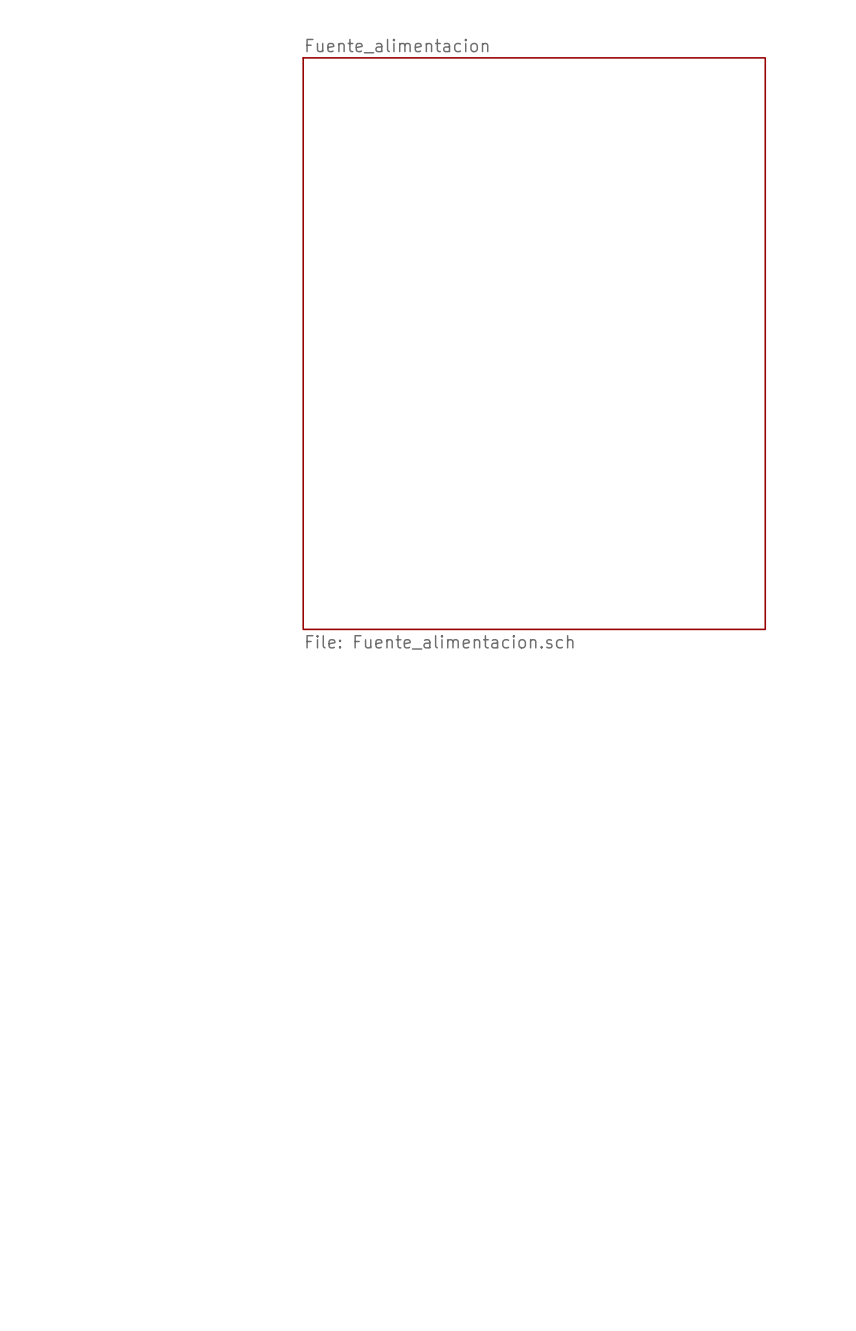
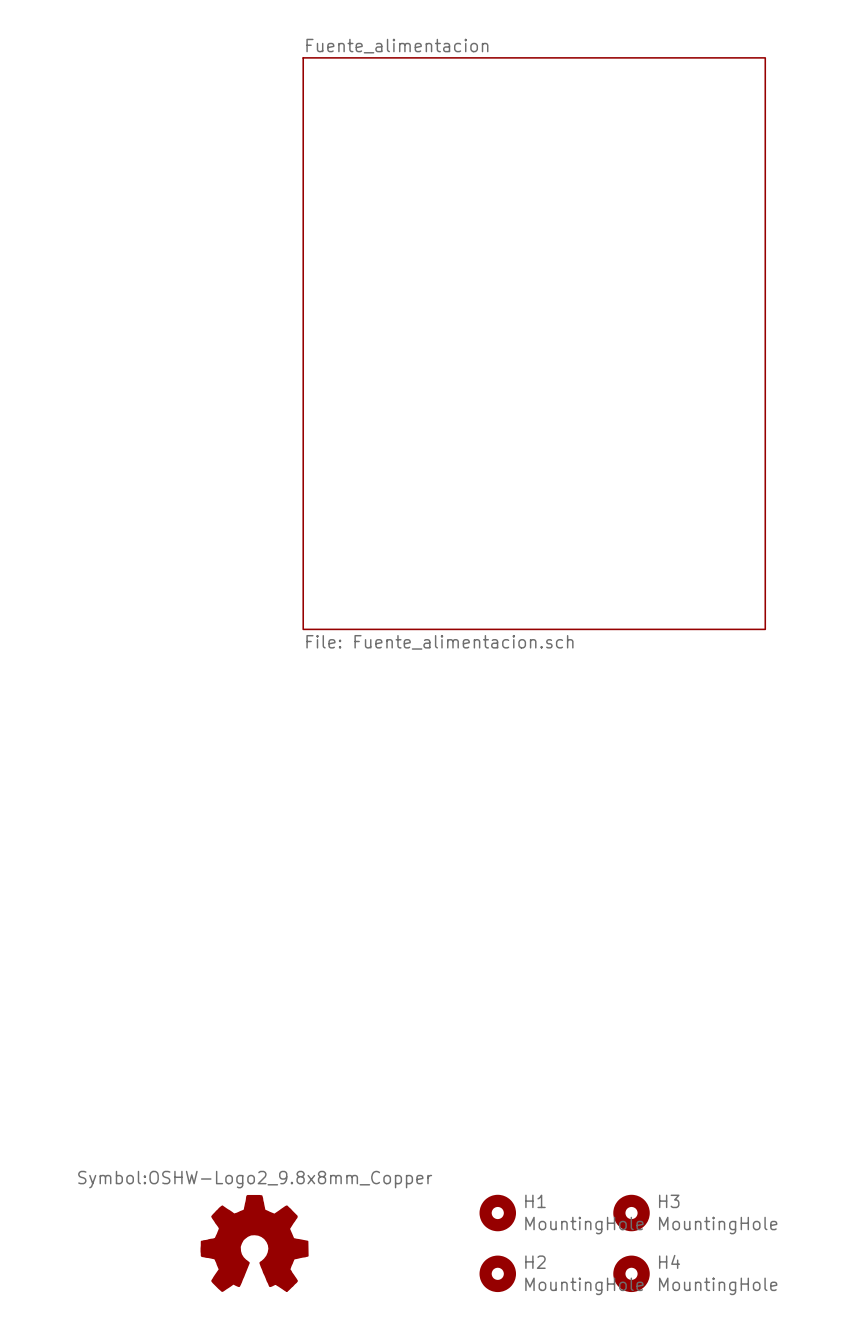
H1: none -> MountingHole (497, 1213)
H3: none -> MountingHole (631, 1213)
power symbol: none -> (254, 1243)
H2: none -> MountingHole (497, 1273)
H4: none -> MountingHole (631, 1273)

